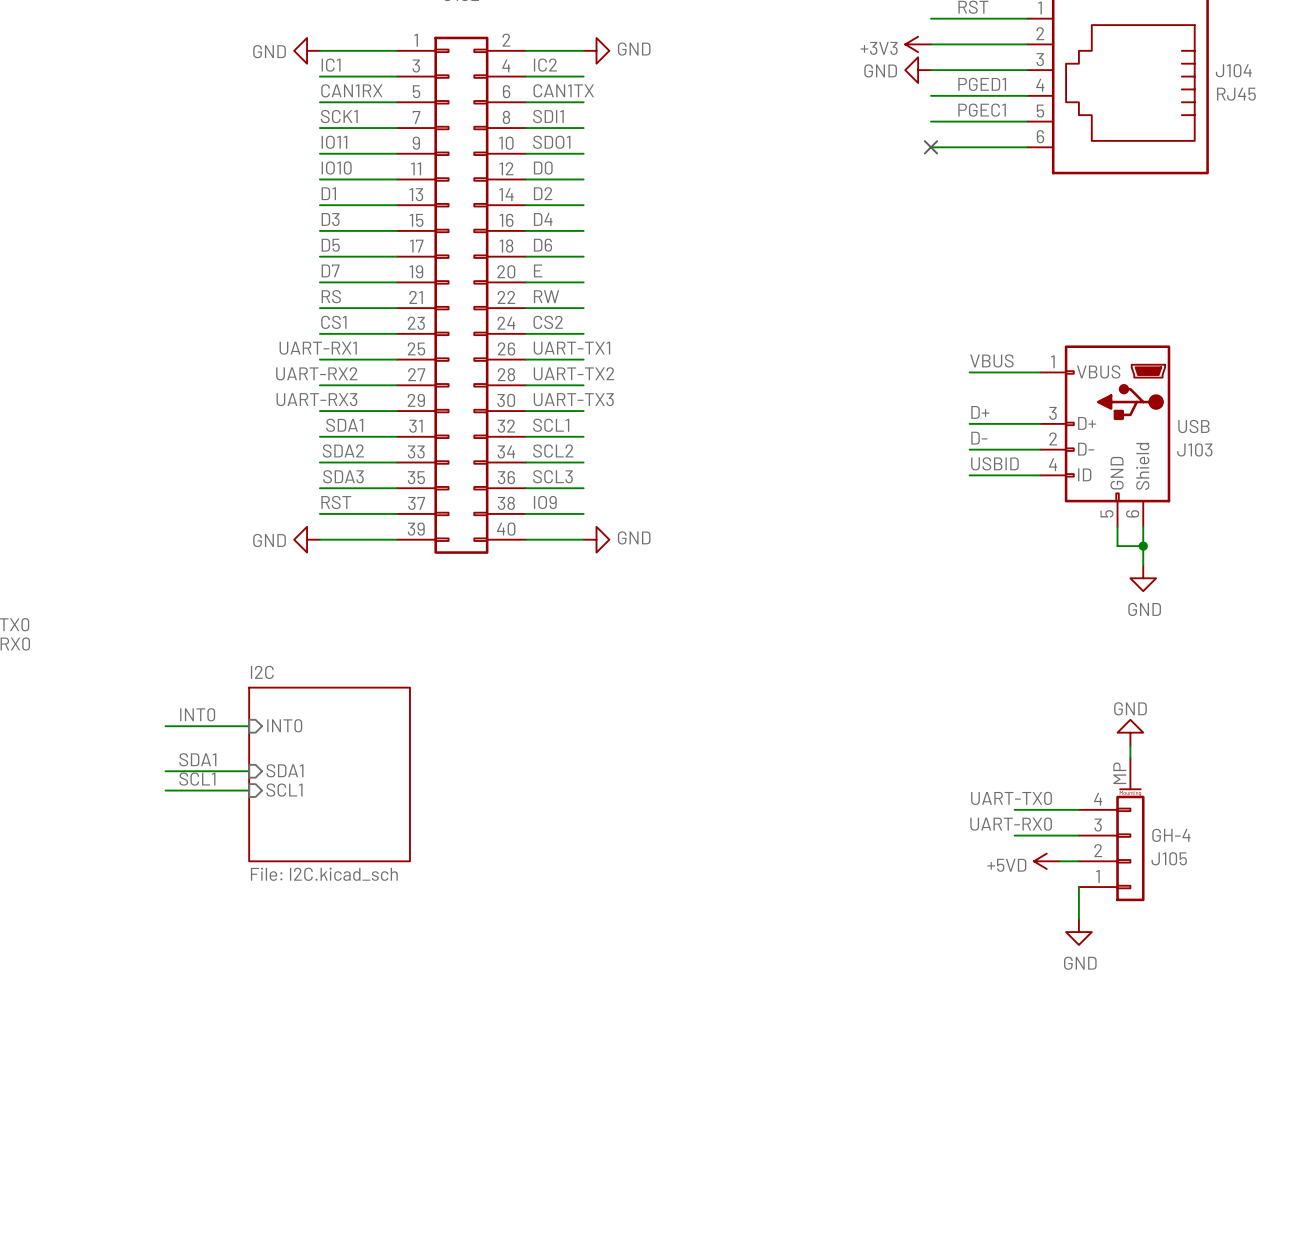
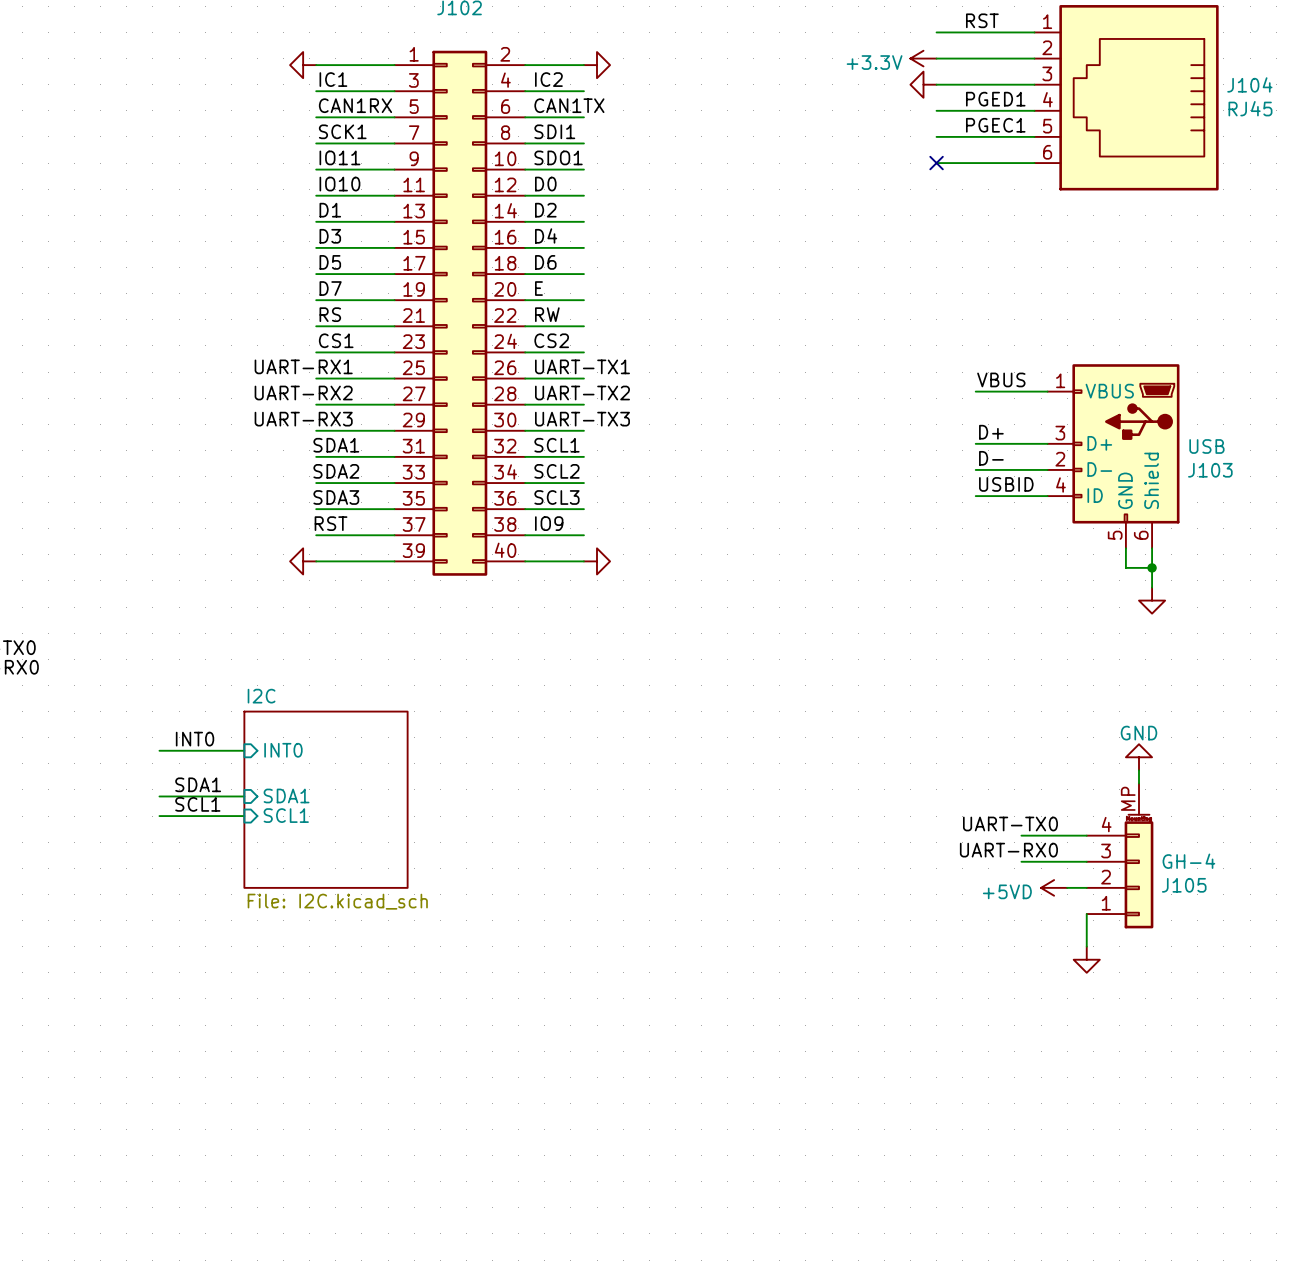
power symbol: +3V3 (918, 44) -> +3.3V (923, 58)
power symbol text: GND (634, 49) -> none
power symbol text: GND (269, 51) -> none
power symbol text: GND (880, 70) -> none
power symbol text: GND (634, 537) -> none
power symbol text: GND (269, 540) -> none
power symbol text: GND (1144, 609) -> none
power symbol text: GND (1080, 963) -> none

